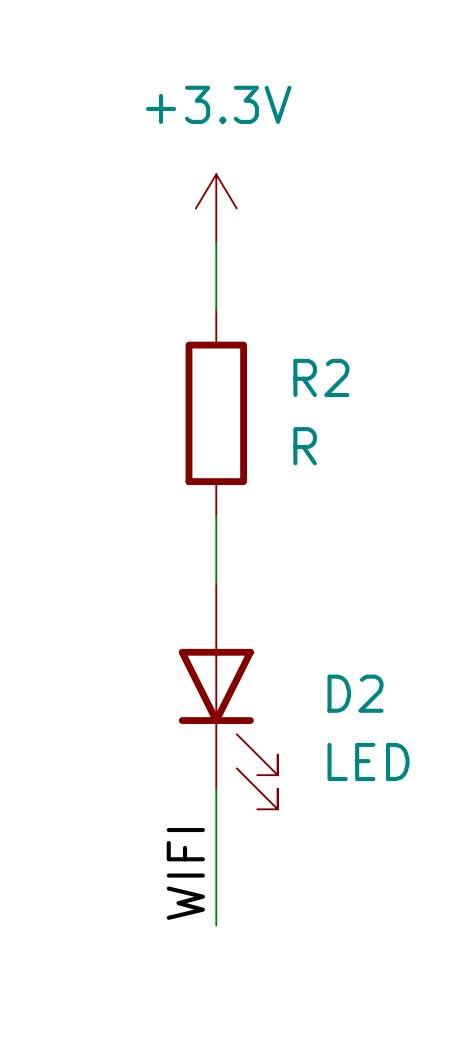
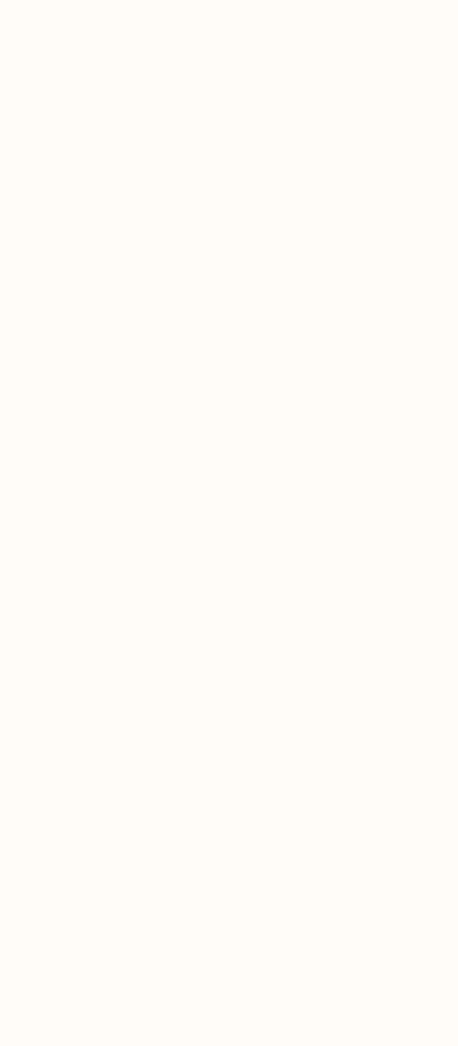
power symbol: +3.3V (216, 208) -> none
wire: (216, 242) (216, 310) -> none
R2: R (216, 413) -> none
wire: (216, 515) (216, 584) -> none
D2: LED (228, 696) -> none
wire: (216, 788) (216, 925) -> none
label: WIFI (185, 873) -> none

